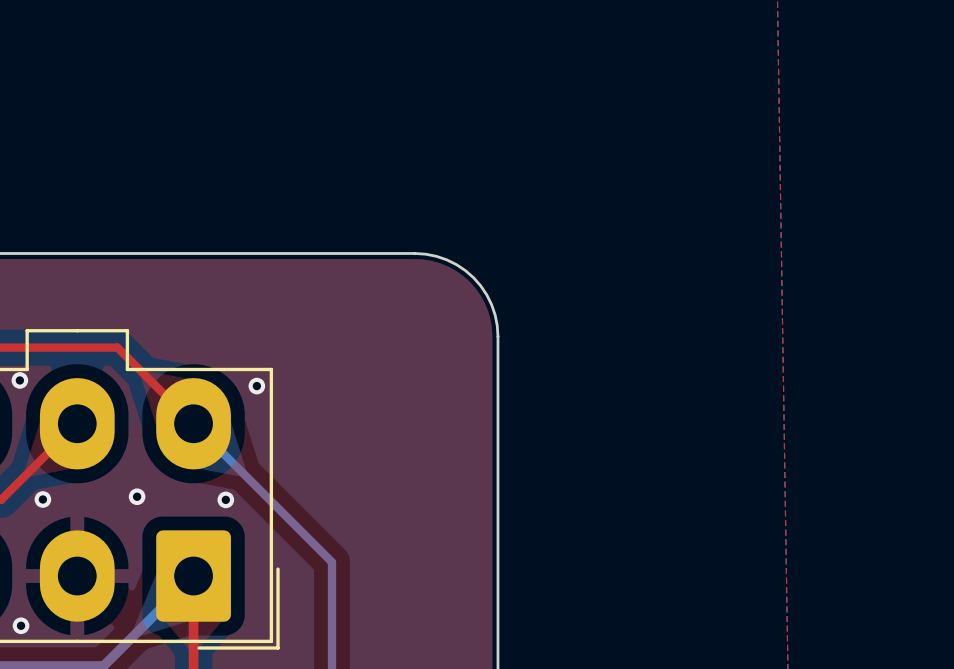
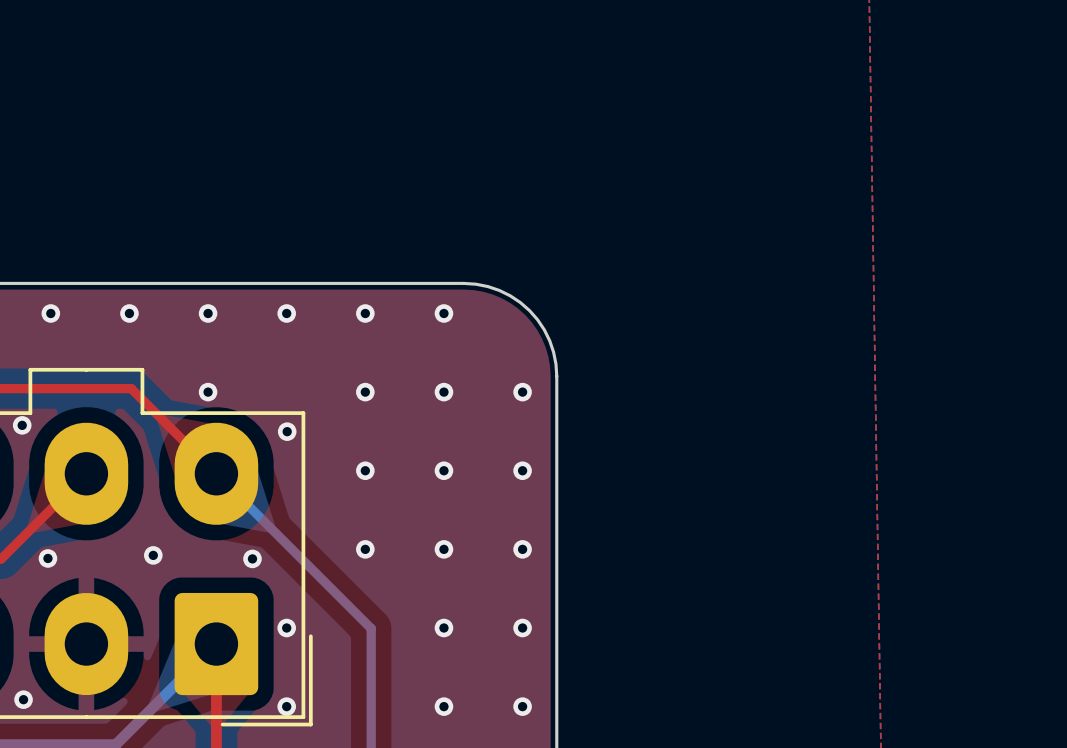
via: none -> (50, 313)
via: none -> (129, 313)
via: none -> (208, 313)
via: none -> (286, 313)
via: none -> (365, 313)
via: none -> (443, 313)
via: none -> (208, 392)
via: none -> (365, 392)
via: none -> (443, 392)
via: none -> (522, 392)
via: none -> (365, 470)
via: none -> (443, 470)
via: none -> (522, 470)
via: none -> (365, 549)
via: none -> (443, 549)
via: none -> (522, 549)
via: none -> (286, 628)
via: none -> (443, 628)
via: none -> (522, 628)
via: none -> (286, 706)
via: none -> (443, 706)
via: none -> (522, 706)

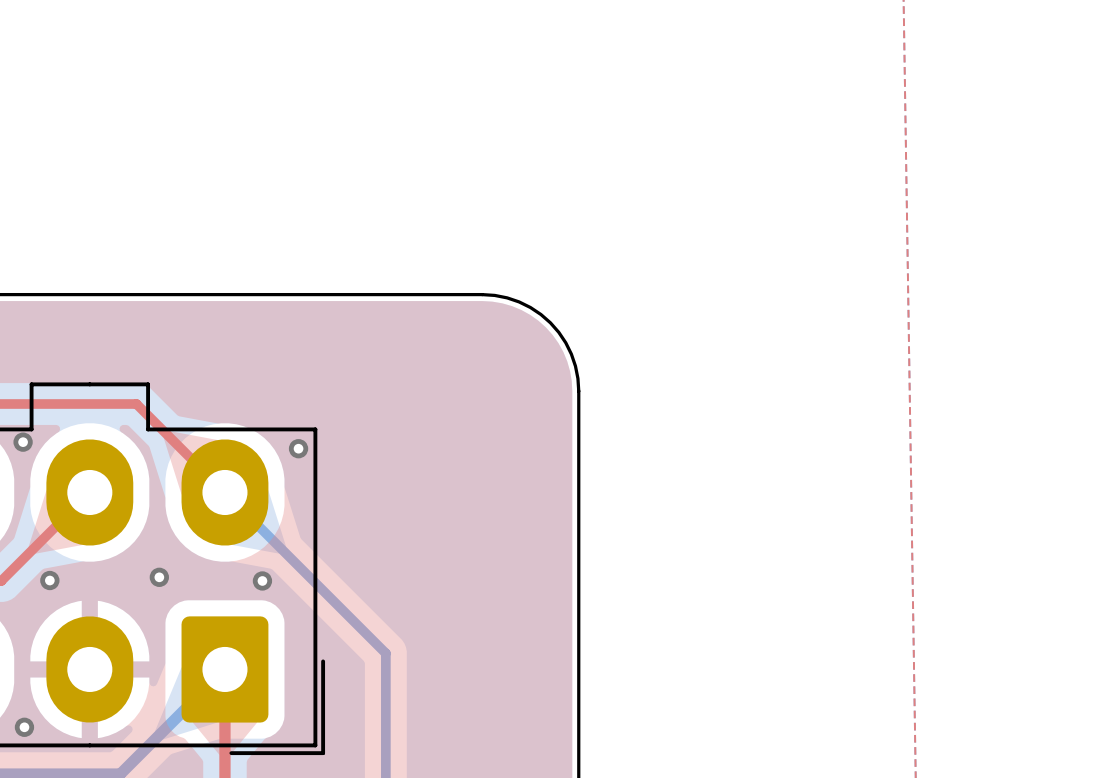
via: (50, 313) -> none
via: (129, 313) -> none
via: (208, 313) -> none
via: (286, 313) -> none
via: (365, 313) -> none
via: (443, 313) -> none
via: (208, 392) -> none
via: (365, 392) -> none
via: (443, 392) -> none
via: (522, 392) -> none
via: (365, 470) -> none
via: (443, 470) -> none
via: (522, 470) -> none
via: (365, 549) -> none
via: (443, 549) -> none
via: (522, 549) -> none
via: (286, 628) -> none
via: (443, 628) -> none
via: (522, 628) -> none
via: (286, 706) -> none
via: (443, 706) -> none
via: (522, 706) -> none

